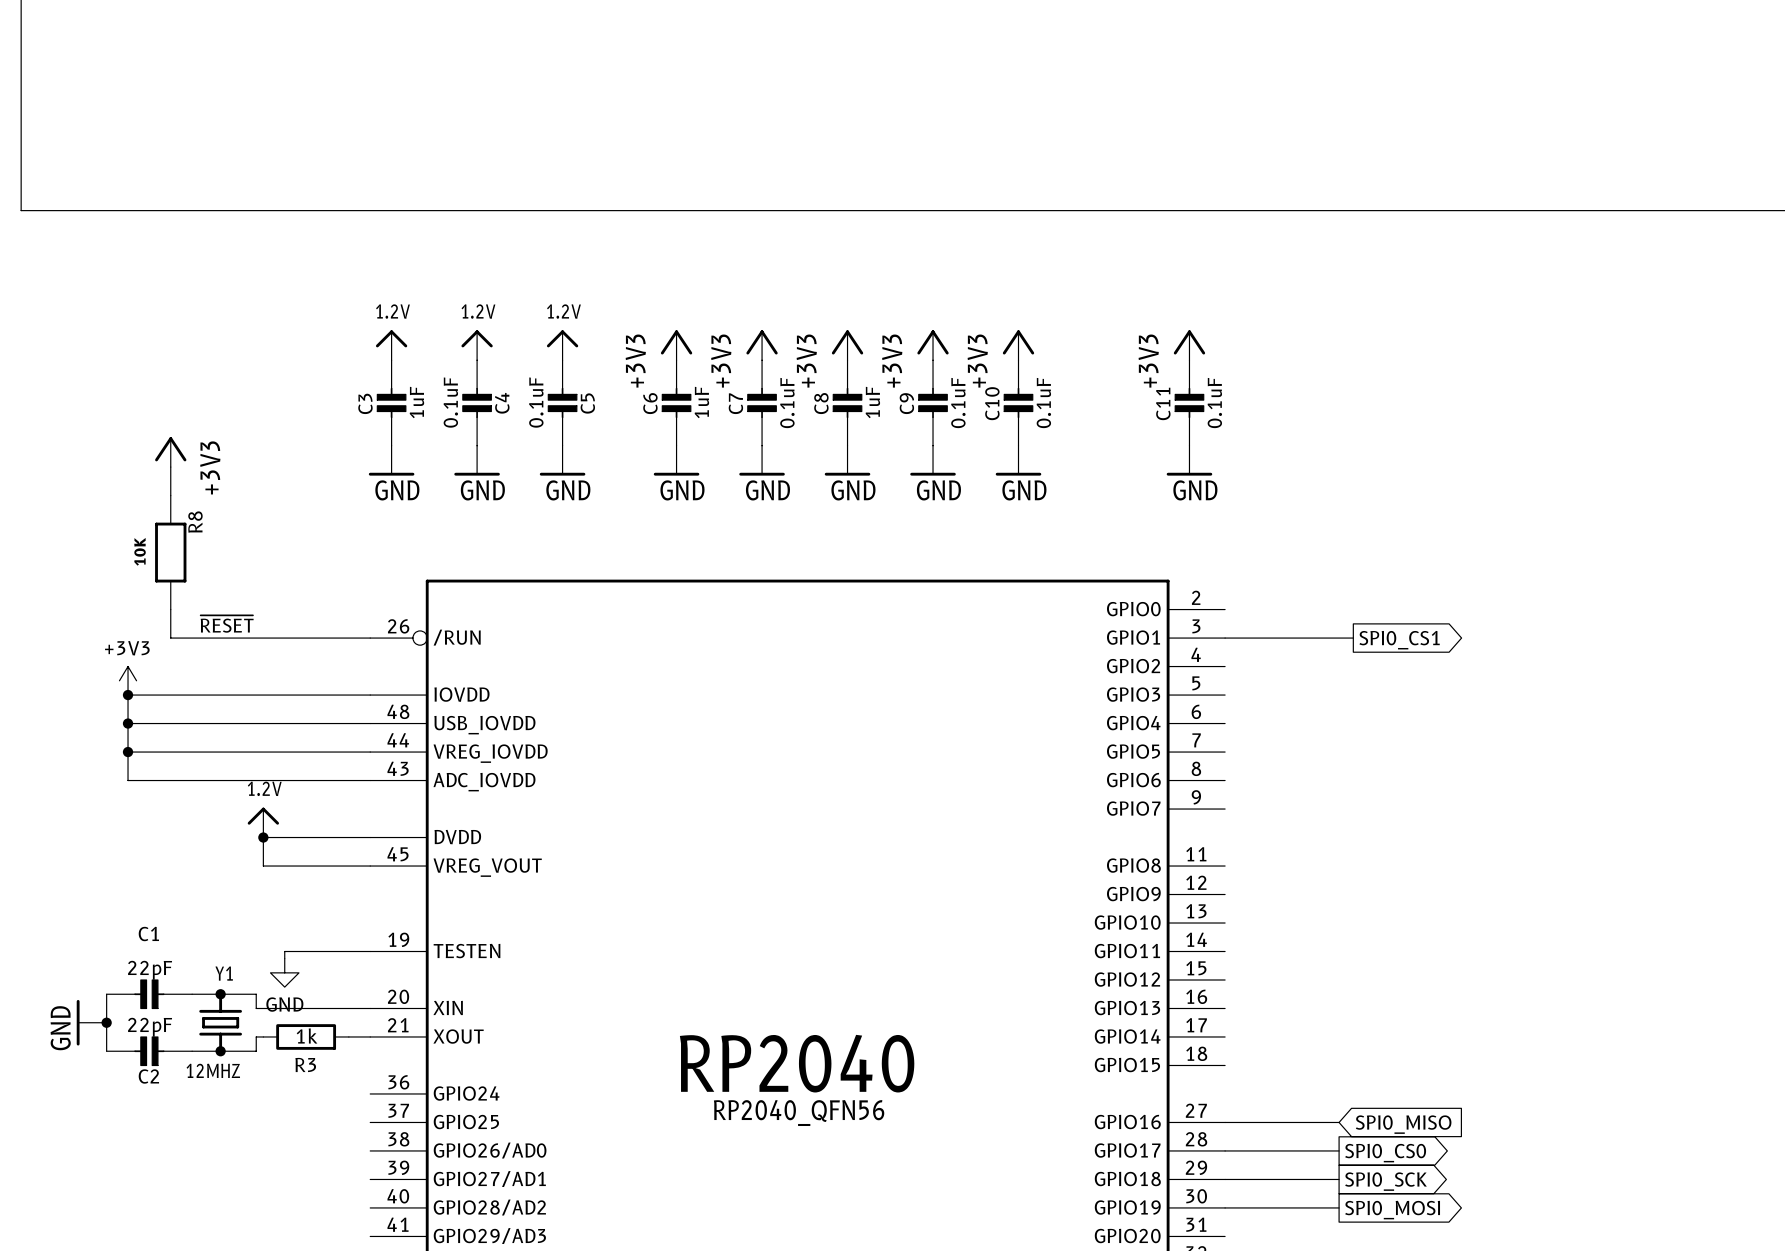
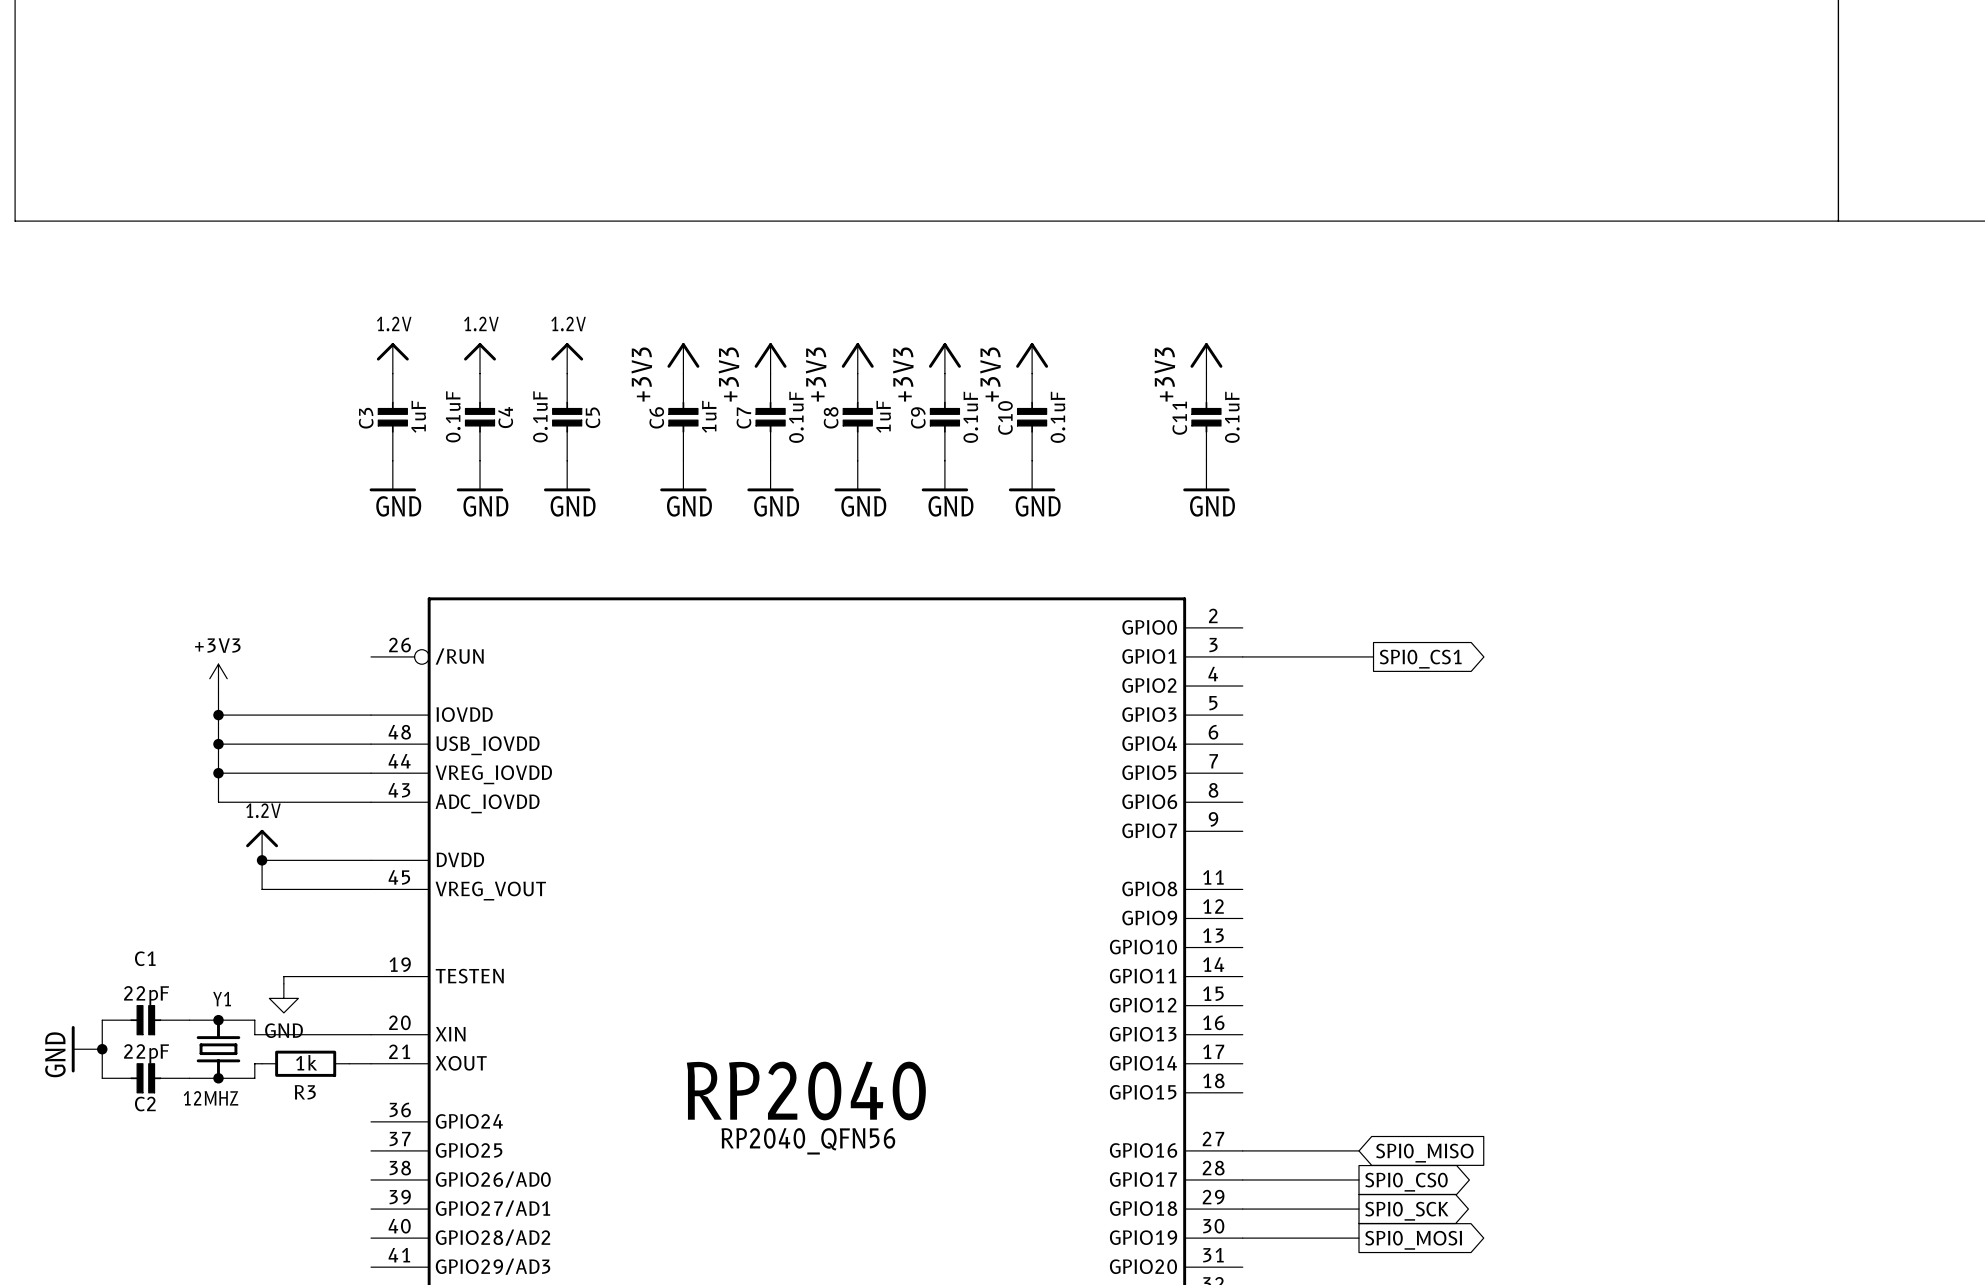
power symbol: +3V3 (170, 452) -> none
wire: (170, 467) (170, 495) -> none
R8: 10K (170, 552) -> none
wire: (170, 609) (170, 638) (370, 638) -> none
label: ~{RESET} (227, 624) -> none
power symbol position: +3V3 (128, 680) -> +3V3 (218, 678)
junction: (128, 695) -> none
wire: (220, 695) (128, 695) (128, 780) (220, 780) -> (218, 693) (218, 802)
junction: none -> (218, 715)
wire: (128, 723) (220, 723) -> none
junction: (128, 723) -> none
junction: none -> (218, 744)
wire: (128, 752) (220, 752) -> none
junction: (128, 752) -> none
junction: none -> (218, 773)

